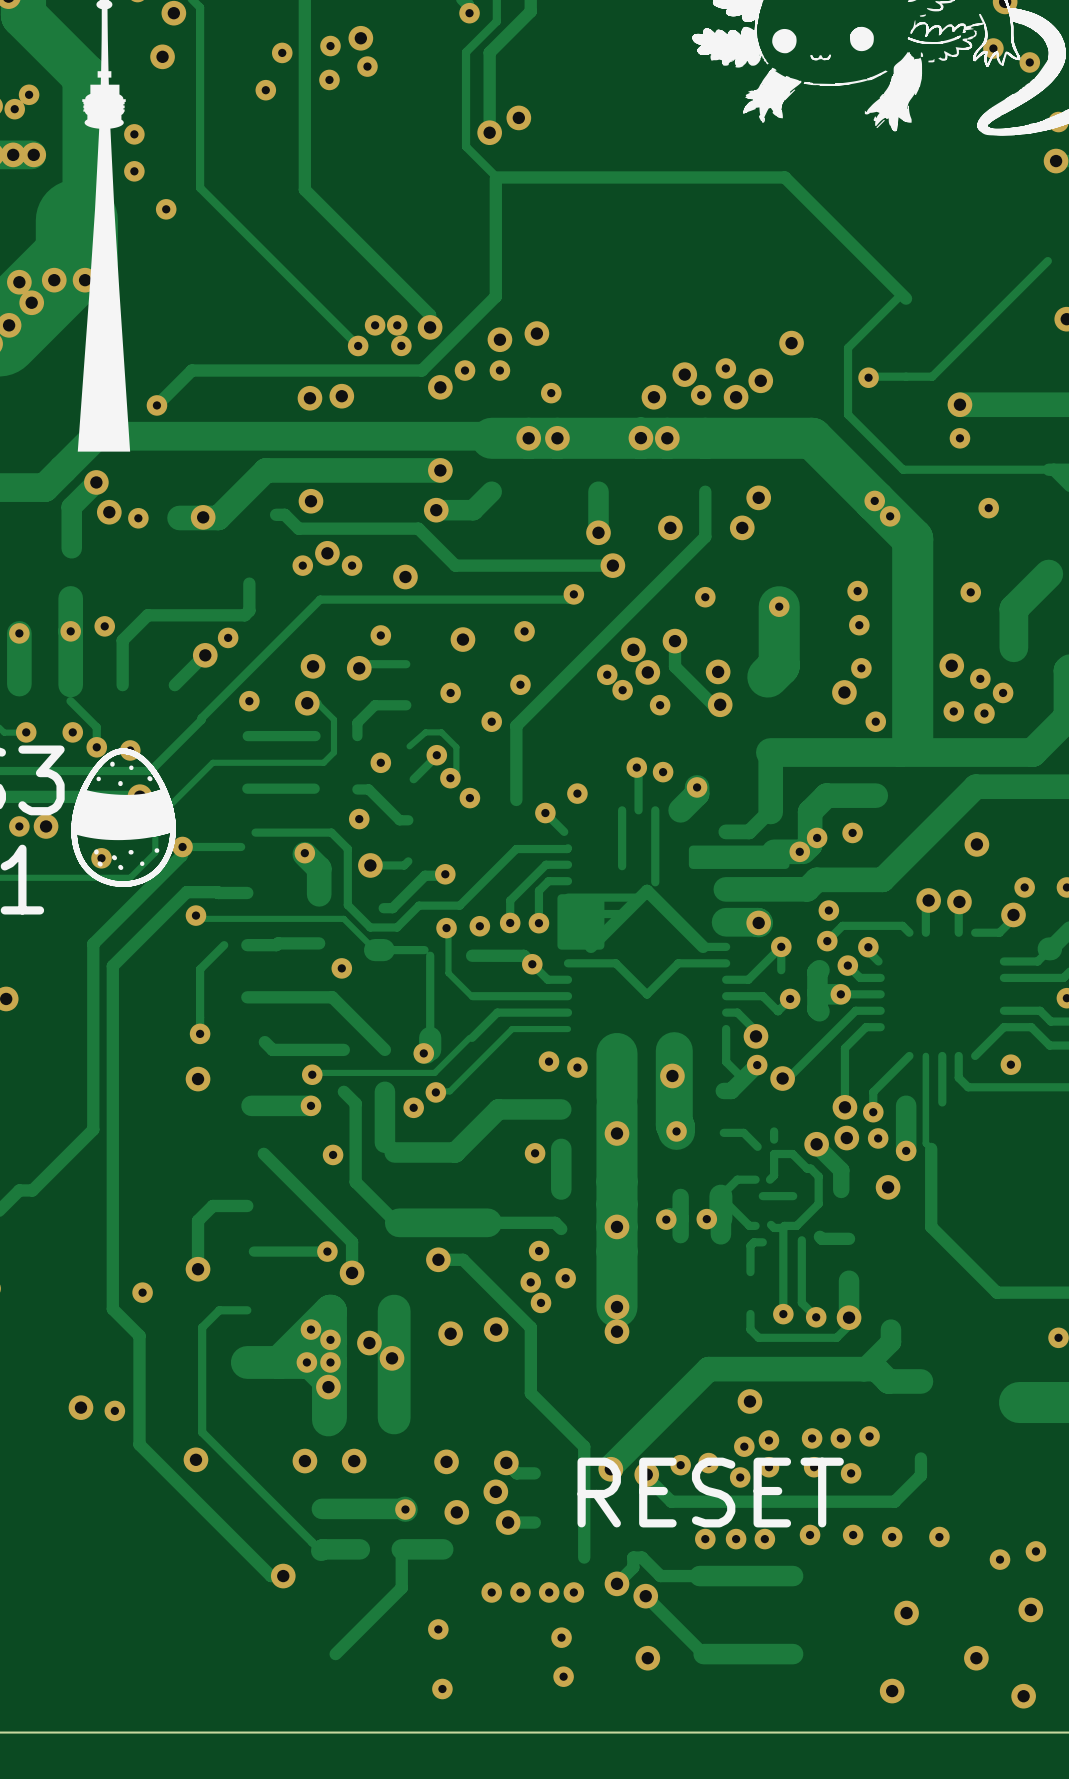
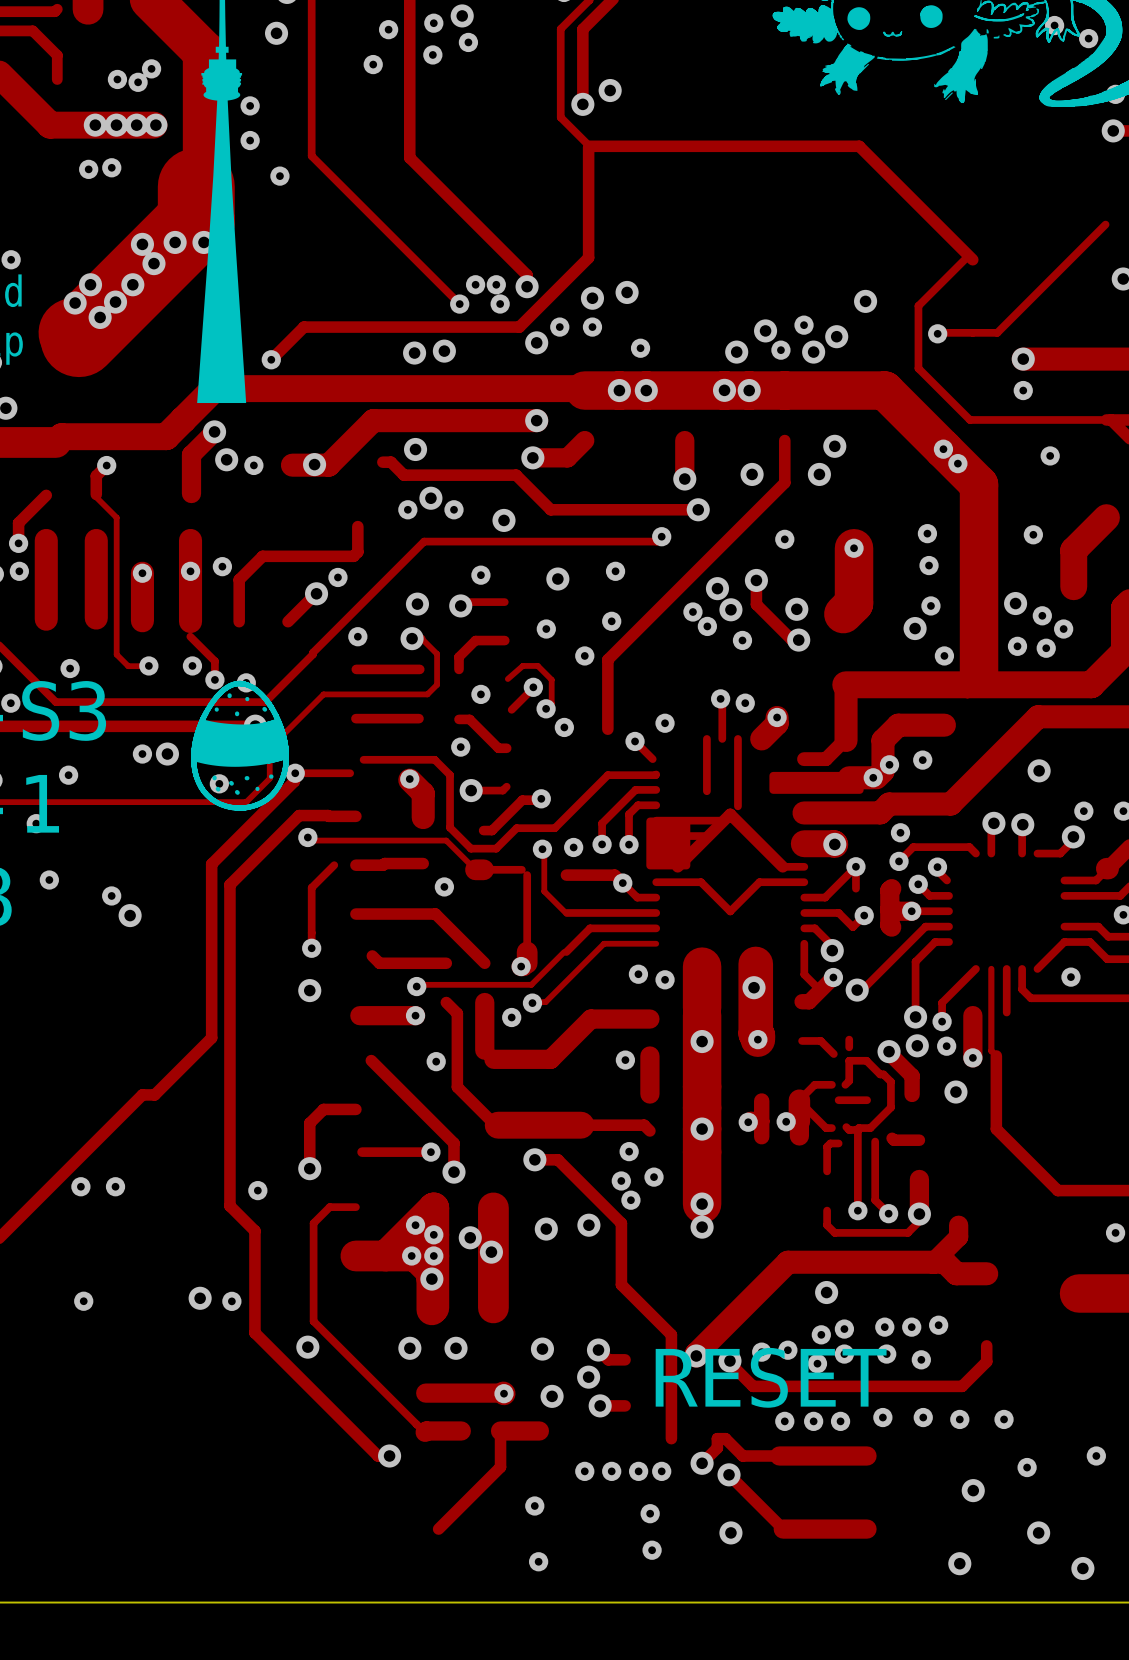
via: (1035, 1551) -> none
via: (1000, 1559) -> none
via: none -> (1096, 1455)
via: none -> (1027, 1467)
via: (1030, 1609) -> none

